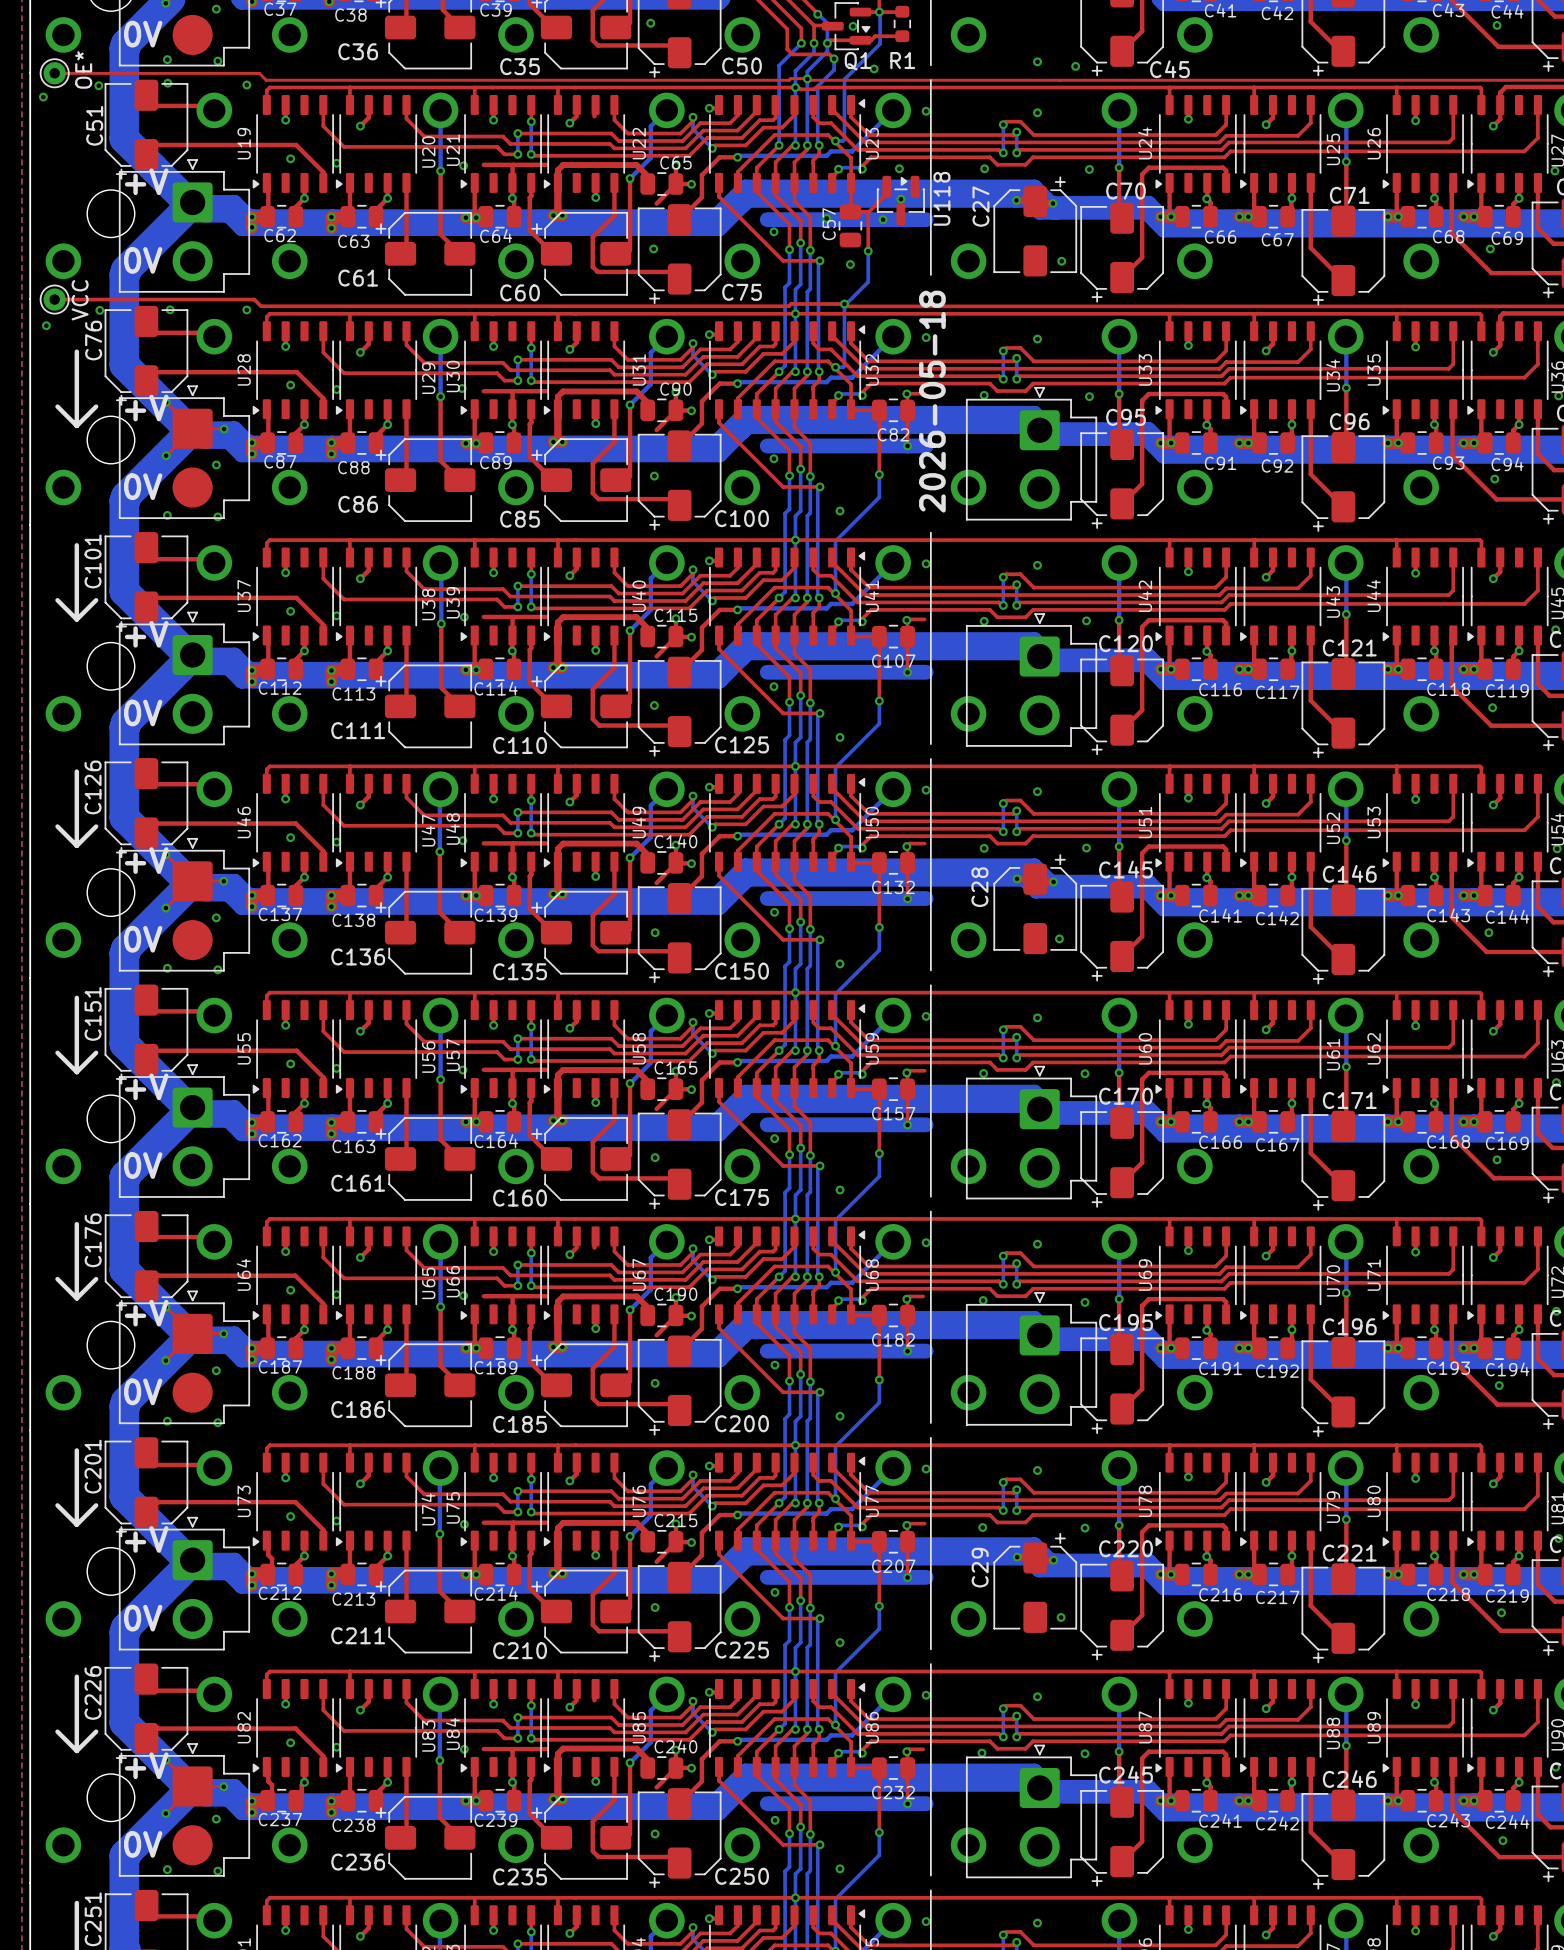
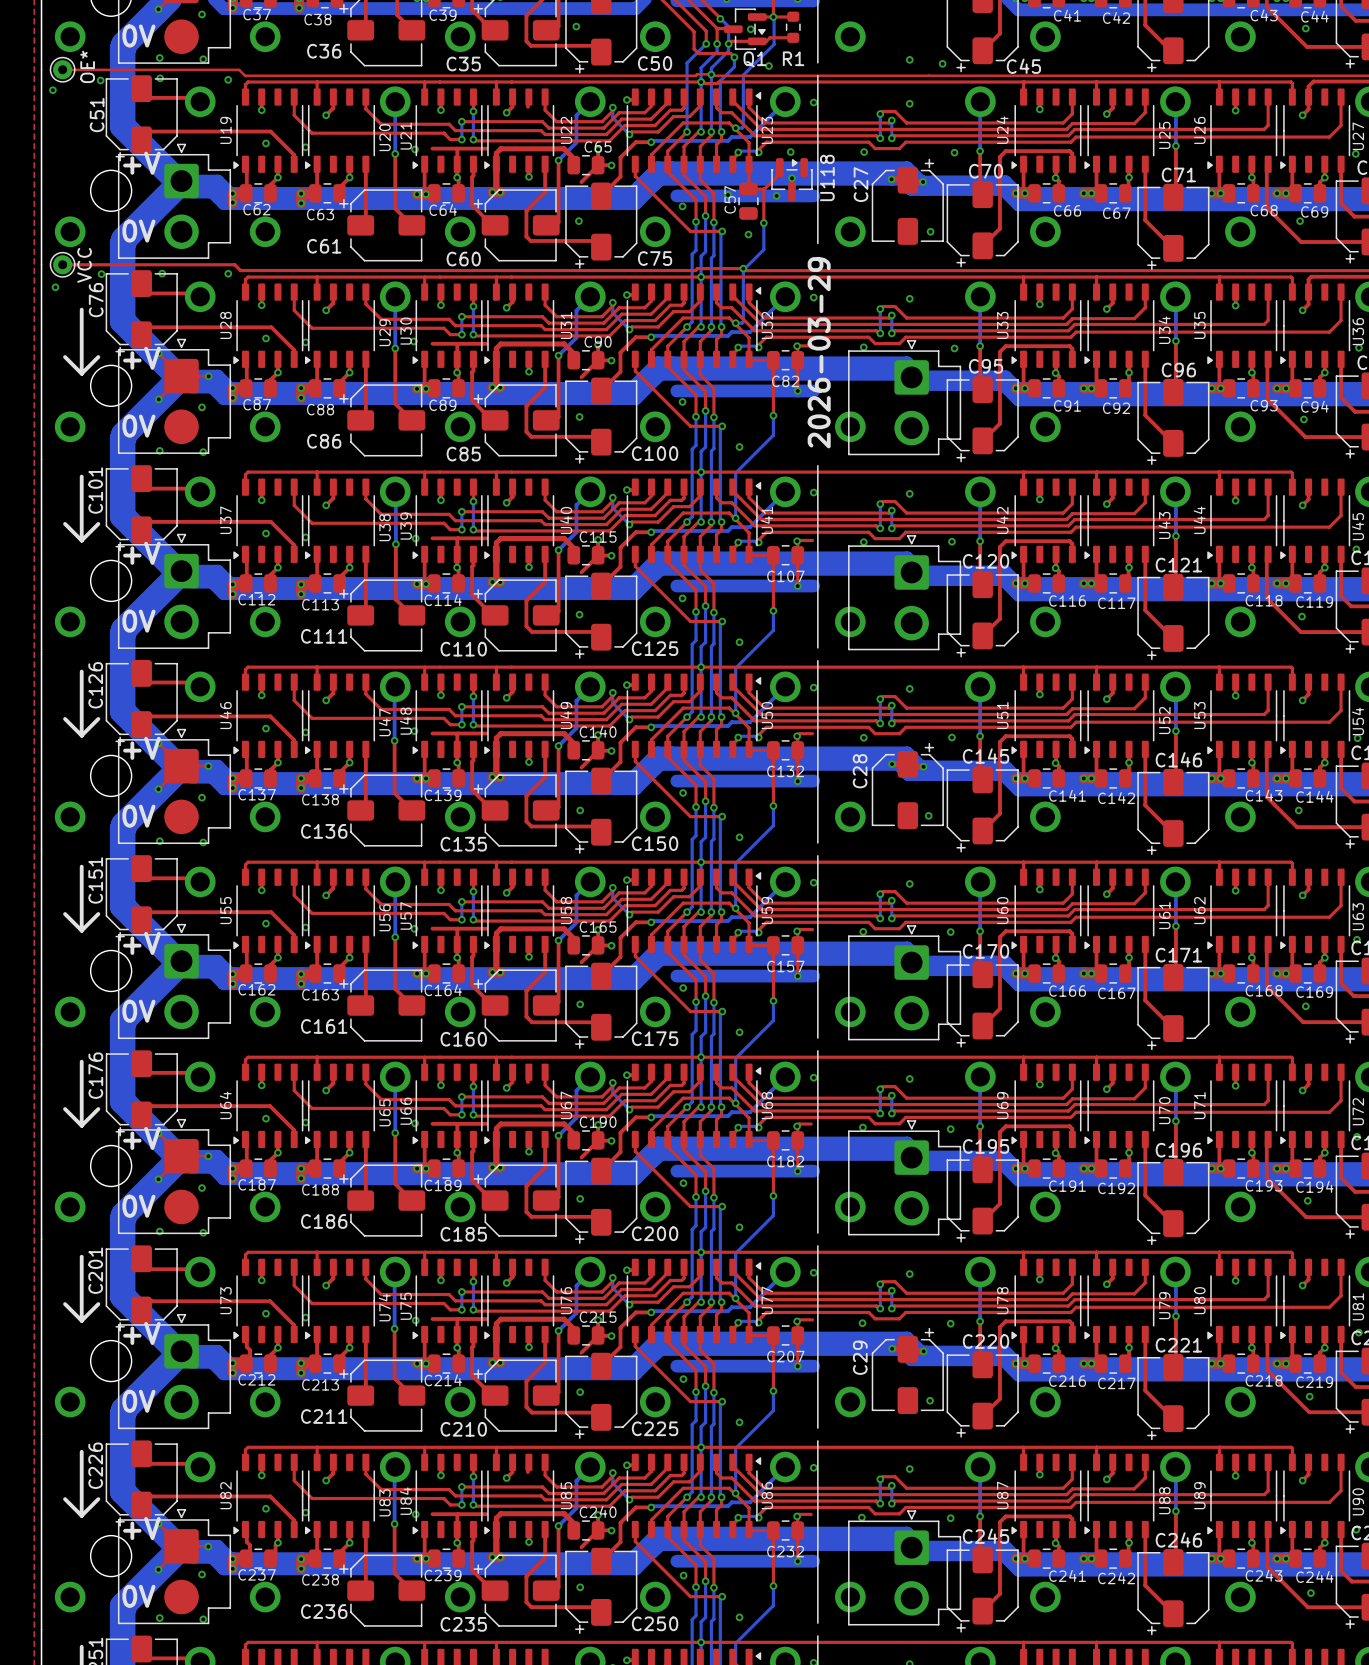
text: 2026-05-18 (932, 401) -> 2026-03-29 (819, 352)

